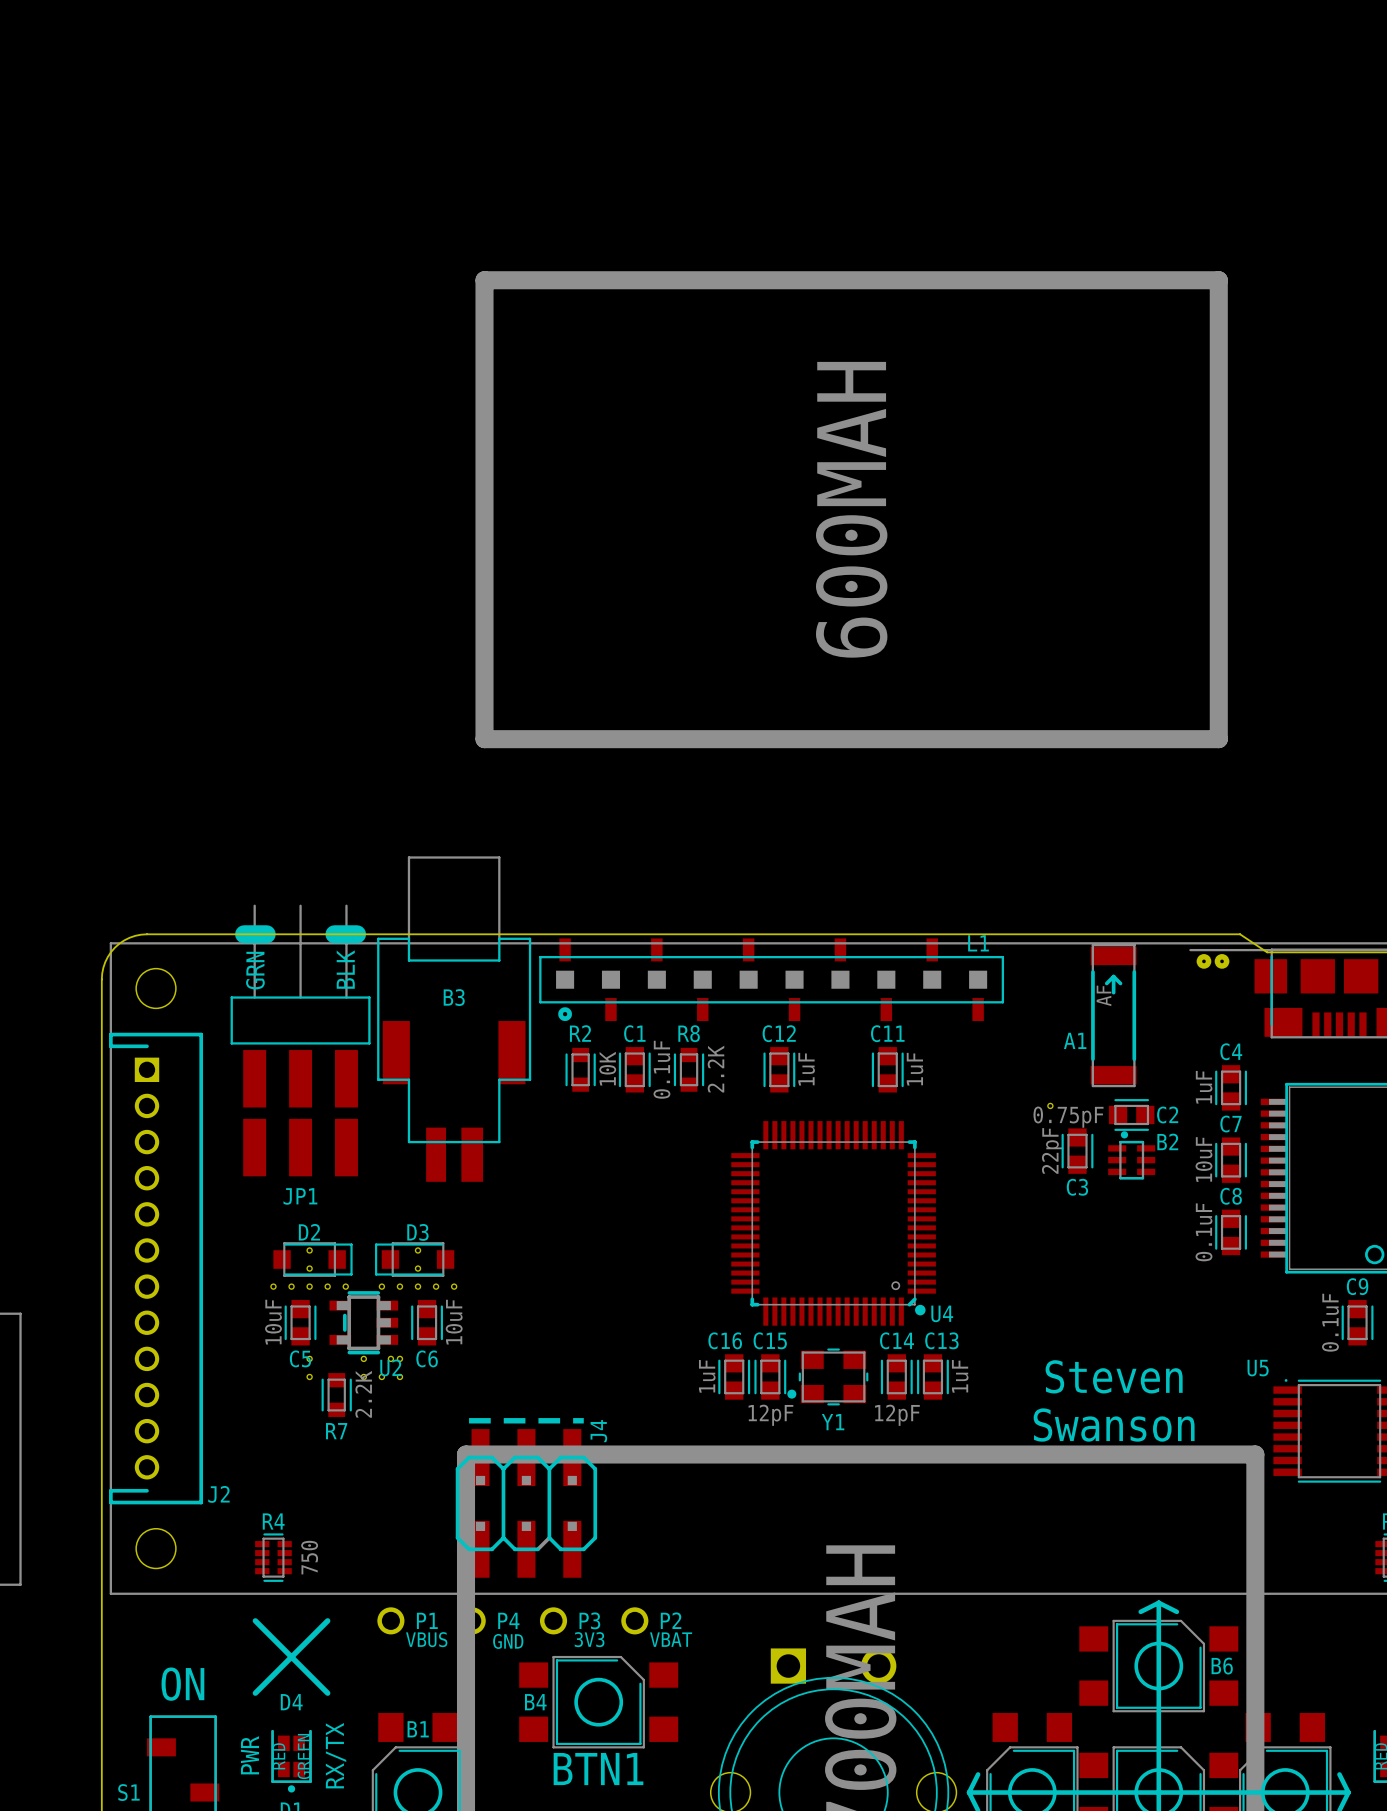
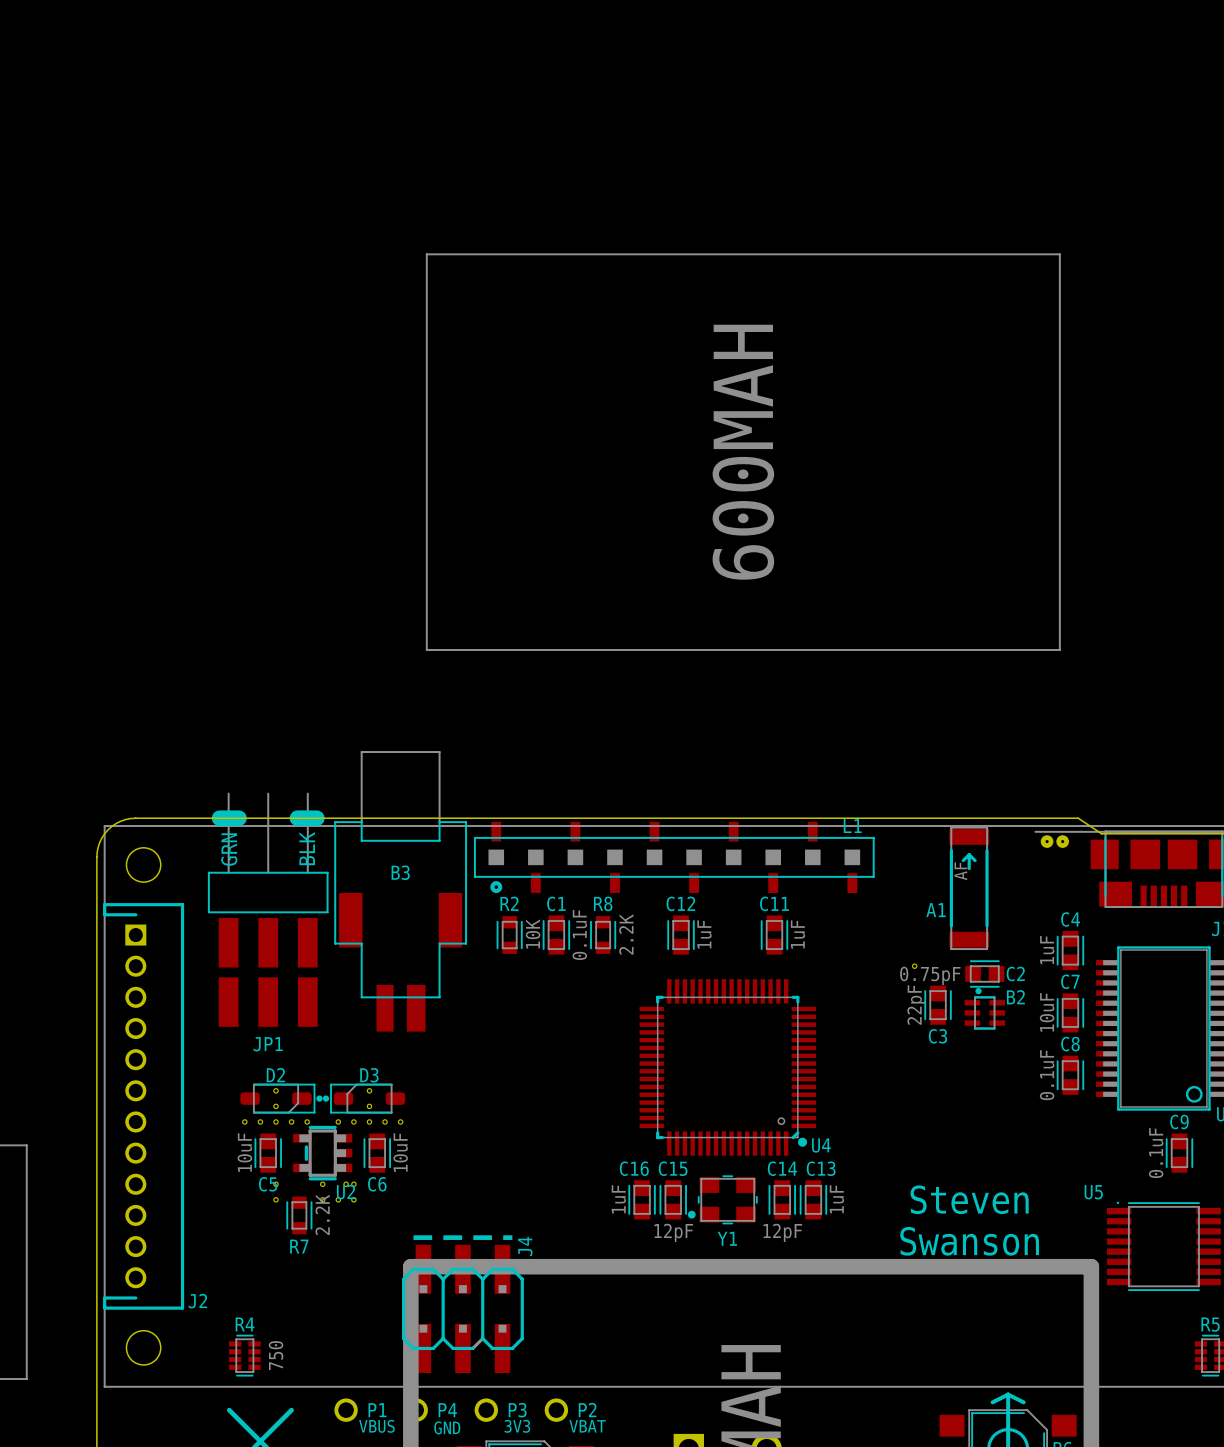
drawing shape: [475, 271, 1228, 749] -> [425, 253, 1061, 651]
D2 footprint: [273, 1242, 353, 1277] -> [240, 1083, 323, 1114]
D3 footprint: [375, 1242, 455, 1277] -> [322, 1083, 406, 1114]

